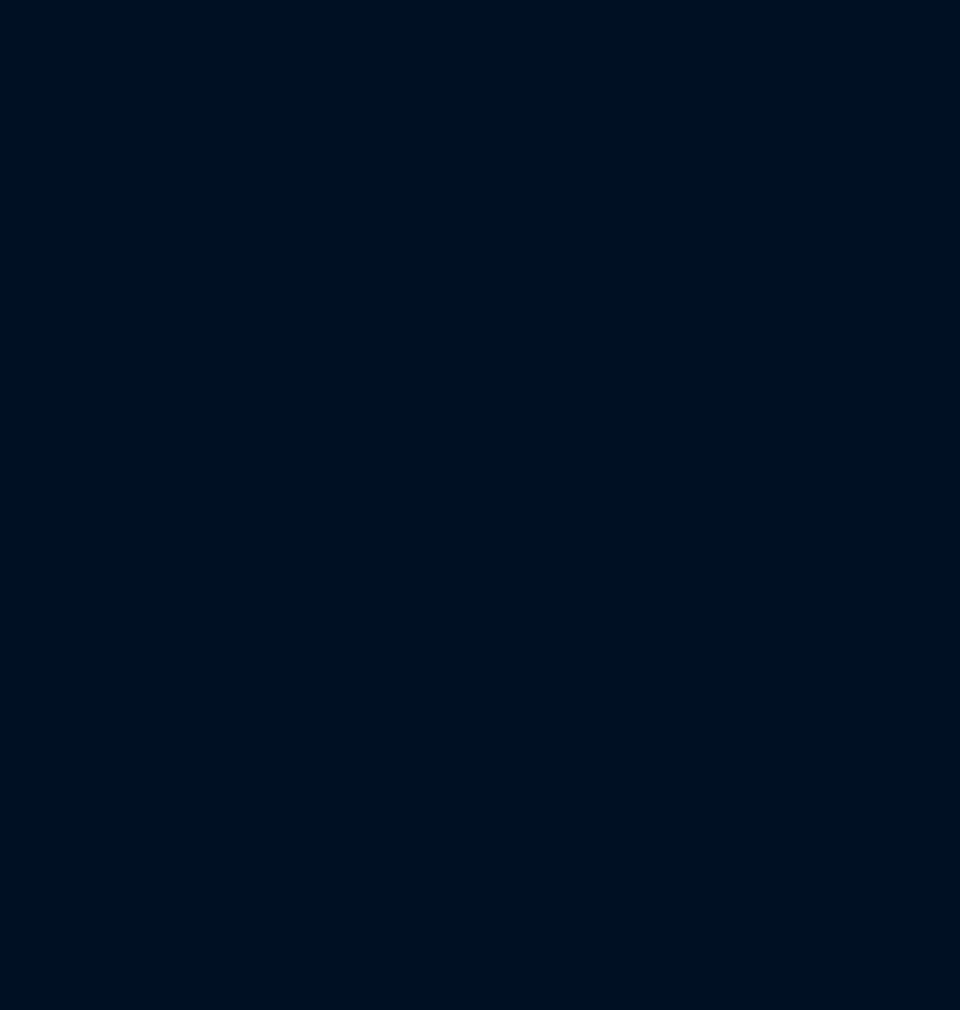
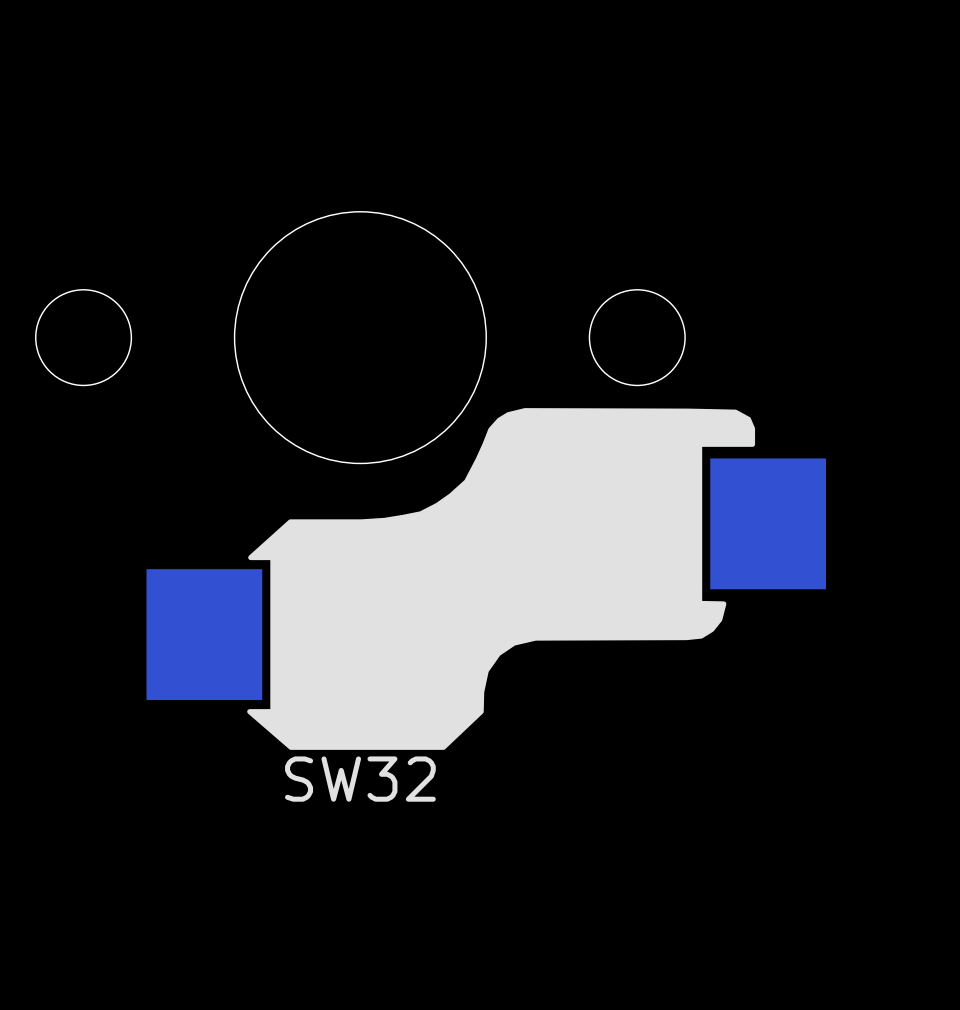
SW32: none -> (430, 388)

